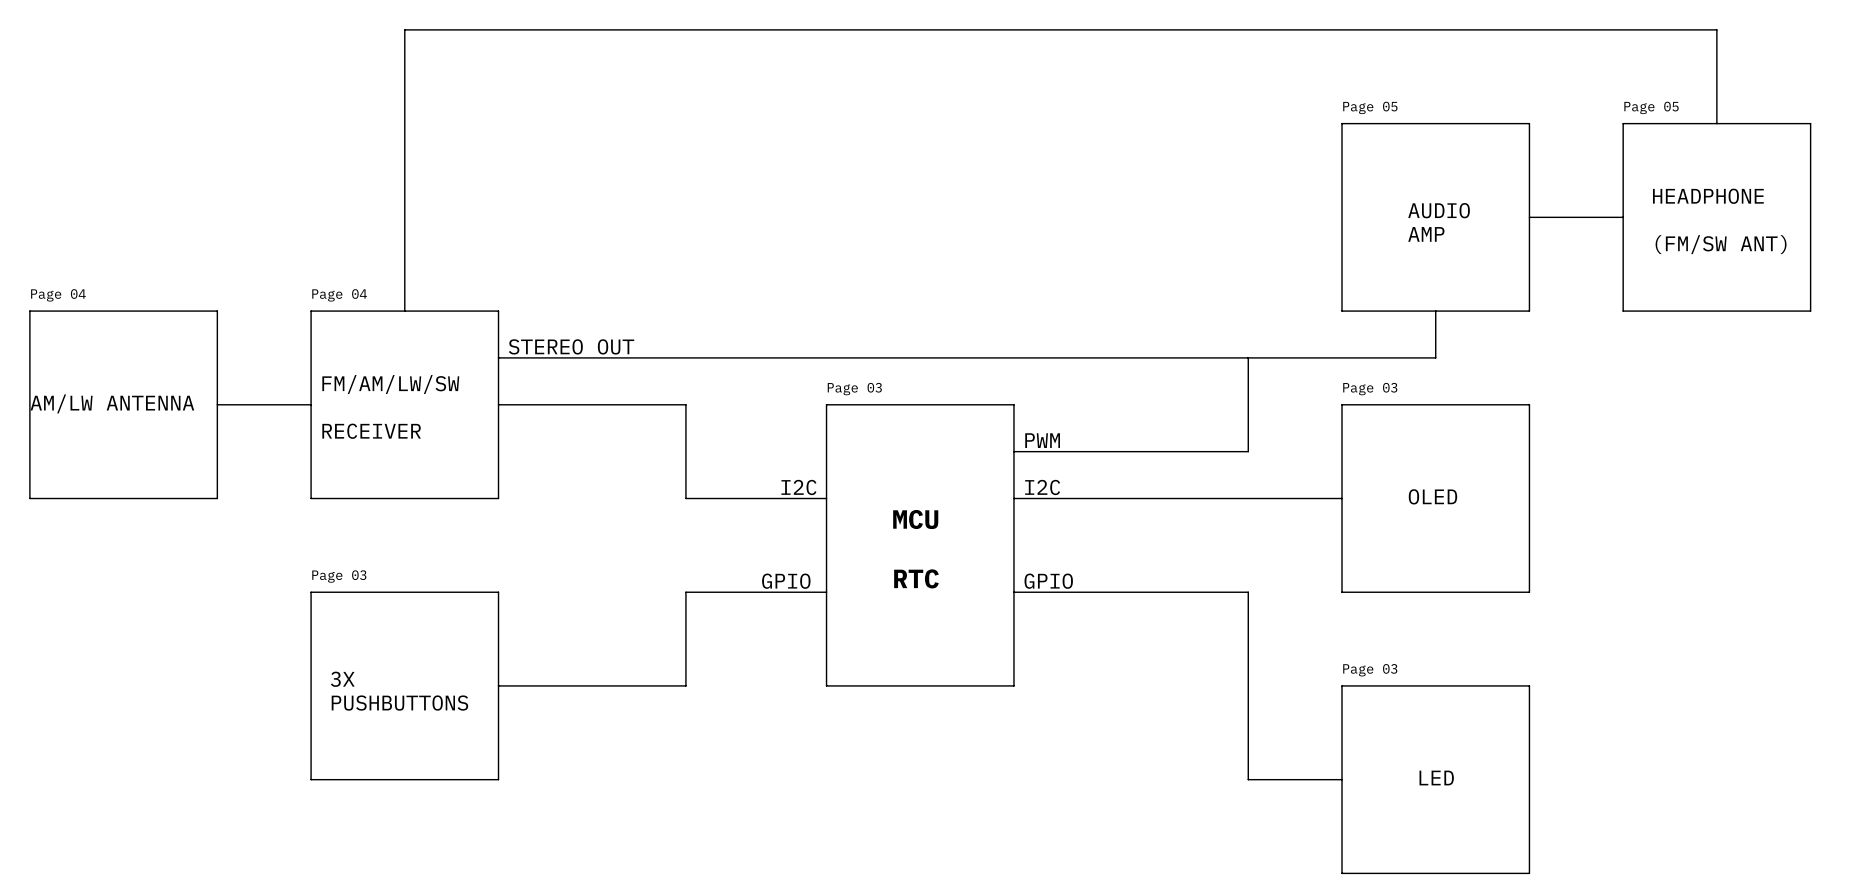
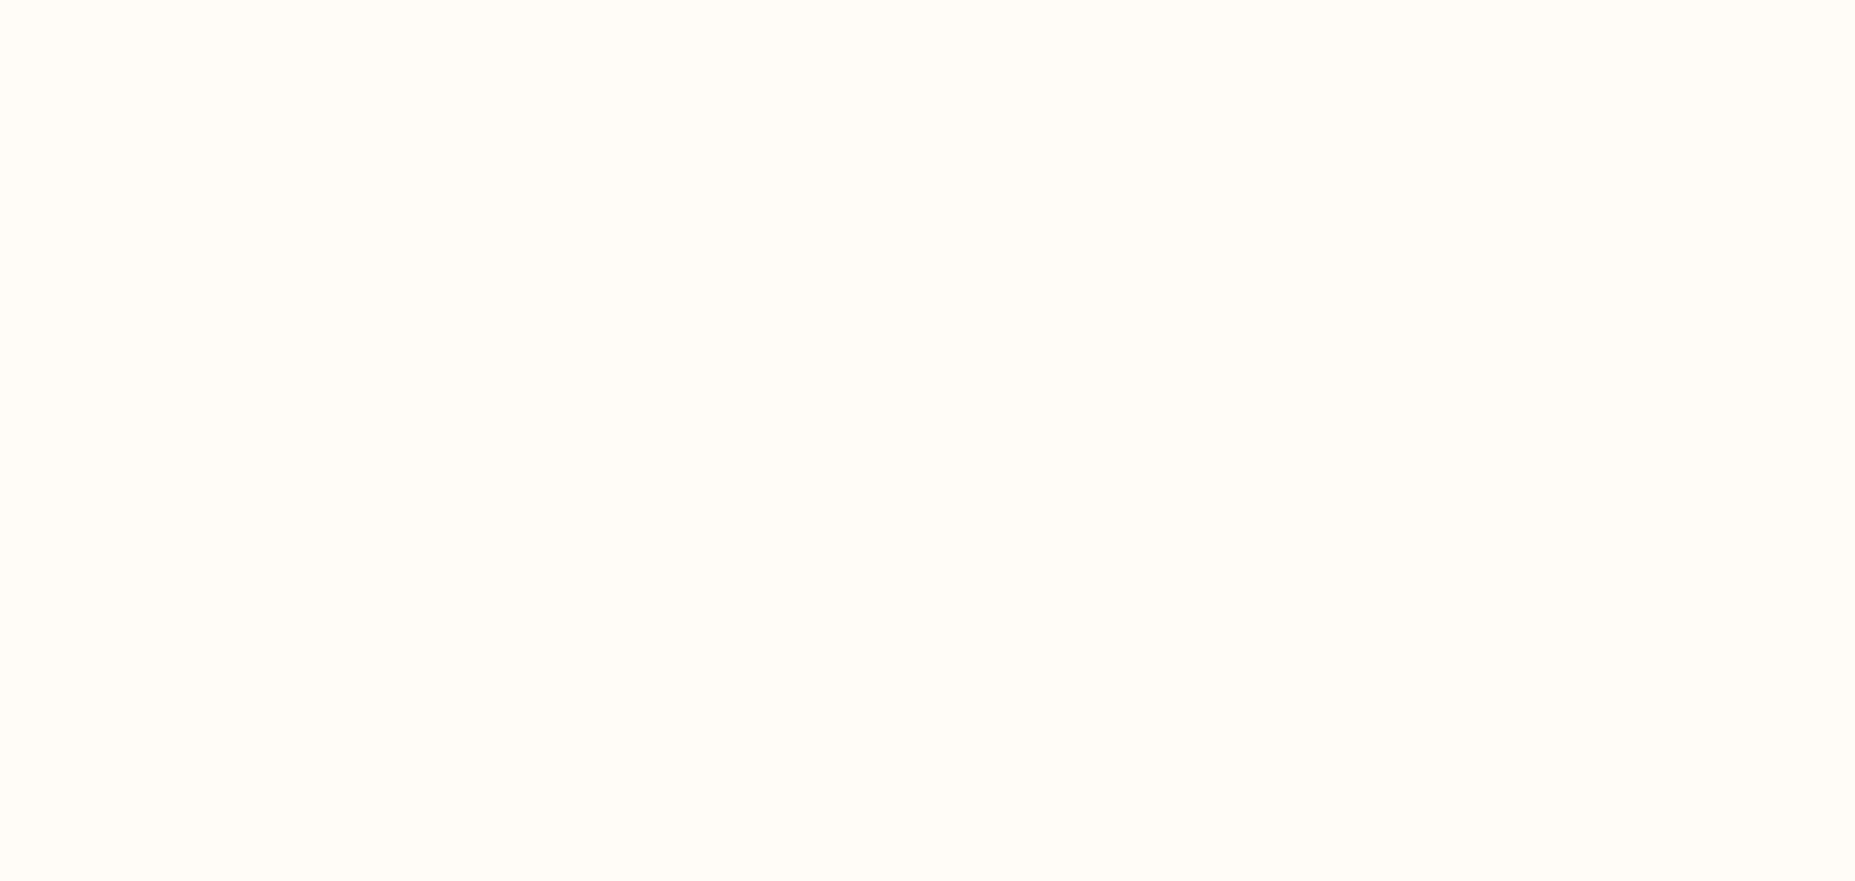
text: Page 05 (1370, 107) -> none
text: Page 05 (1651, 107) -> none
line: (1342, 123) (1342, 311) (1529, 311) (1529, 123) (1342, 123) -> none
line: (1623, 123) (1623, 311) (1810, 311) (1810, 123) (1623, 123) -> none
line: (1716, 123) (1716, 29) (404, 29) (404, 311) -> none
text: HEADPHONE (1708, 196) -> none
text: AUDIO (1439, 210) -> none
line: (1529, 217) (1623, 217) -> none
text: AMP (1426, 234) -> none
text: (FM/SW ANT) (1721, 244) -> none
text: Page 04 (58, 295) -> none
text: Page 04 (339, 295) -> none
line: (29, 311) (217, 311) (217, 498) (29, 498) (29, 311) -> none
line: (311, 311) (498, 311) (498, 498) (311, 498) (311, 311) -> none
line: (1435, 311) (1435, 357) (498, 357) -> none
text: STEREO OUT (571, 346) -> none
line: (1248, 357) (1248, 451) (1013, 451) -> none
text: FM/AM/LW/SW (390, 384) -> none
text: Page 03 (854, 389) -> none
text: Page 03 (1370, 389) -> none
text: AM/LW ANTENNA (112, 403) -> none
line: (217, 404) (311, 404) -> none
line: (498, 404) (685, 404) (685, 498) (826, 498) -> none
line: (826, 404) (1013, 404) (1013, 685) (826, 685) (826, 404) -> none
line: (1342, 404) (1529, 404) (1529, 592) (1342, 592) (1342, 404) -> none
text: RECEIVER (371, 431) -> none
text: PWM (1042, 440) -> none
text: I2C (798, 487) -> none
text: I2C (1042, 487) -> none
text: OLED (1432, 496) -> none
line: (1013, 498) (1342, 498) -> none
text: MCU (915, 519) -> none
text: Page 03 (339, 576) -> none
text: RTC (916, 578) -> none
text: GPIO (786, 581) -> none
text: GPIO (1048, 581) -> none
line: (311, 592) (498, 592) (498, 779) (311, 779) (311, 592) -> none
line: (826, 592) (685, 592) (685, 685) (498, 685) -> none
line: (1013, 592) (1248, 592) (1248, 779) (1342, 779) -> none
text: Page 03 (1370, 670) -> none
text: 3X (342, 679) -> none
line: (1342, 685) (1529, 685) (1529, 873) (1342, 873) (1342, 685) -> none
text: PUSHBUTTONS (399, 703) -> none
text: LED (1436, 778) -> none

